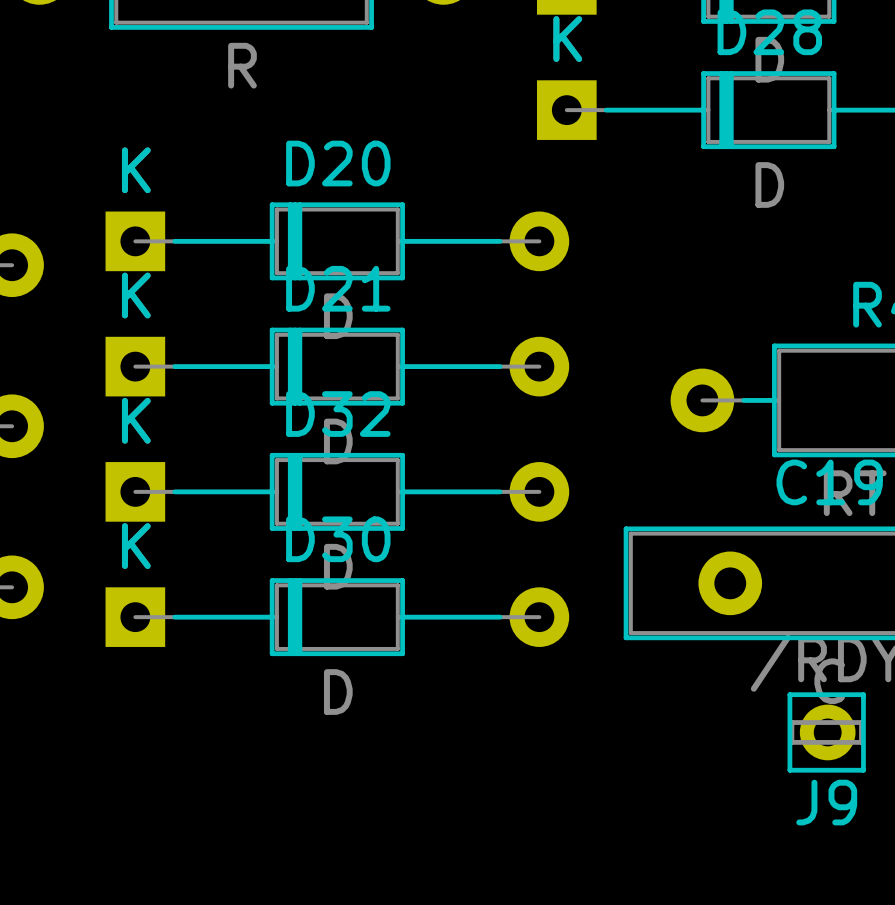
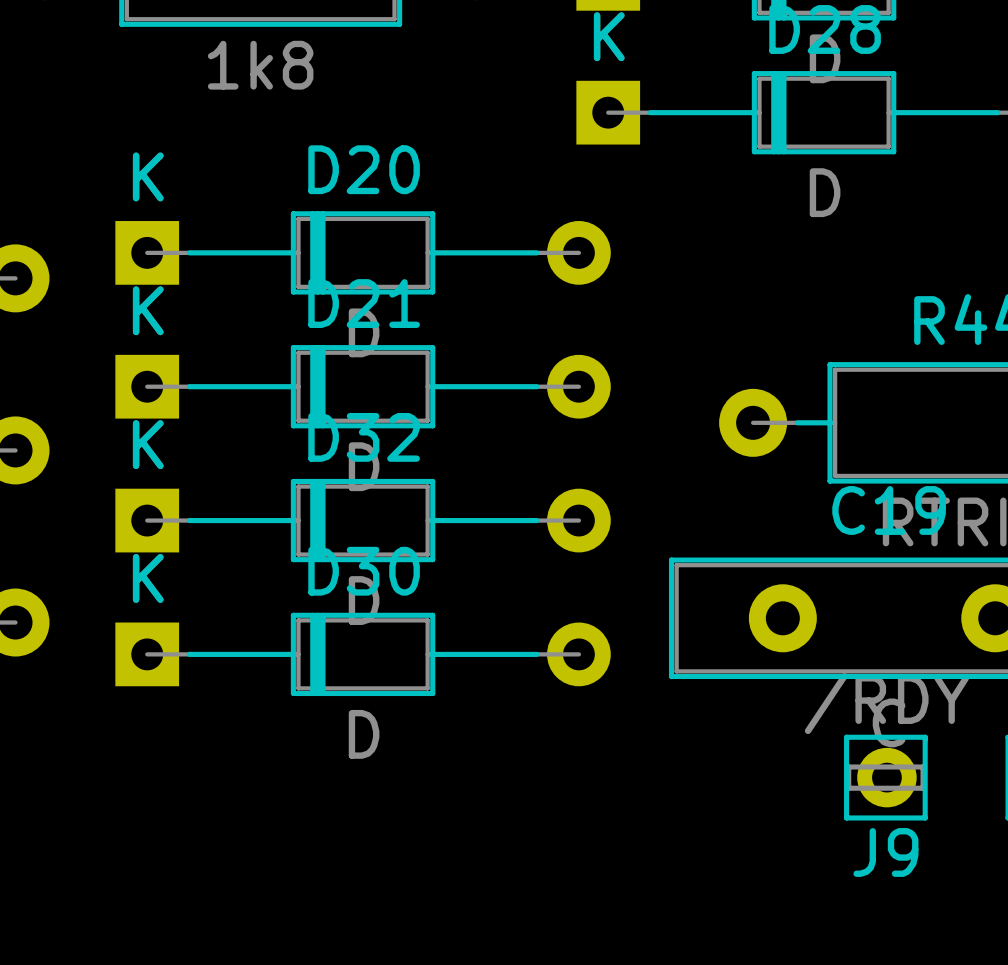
part value: R (242, 65) -> 1k8 (260, 65)

